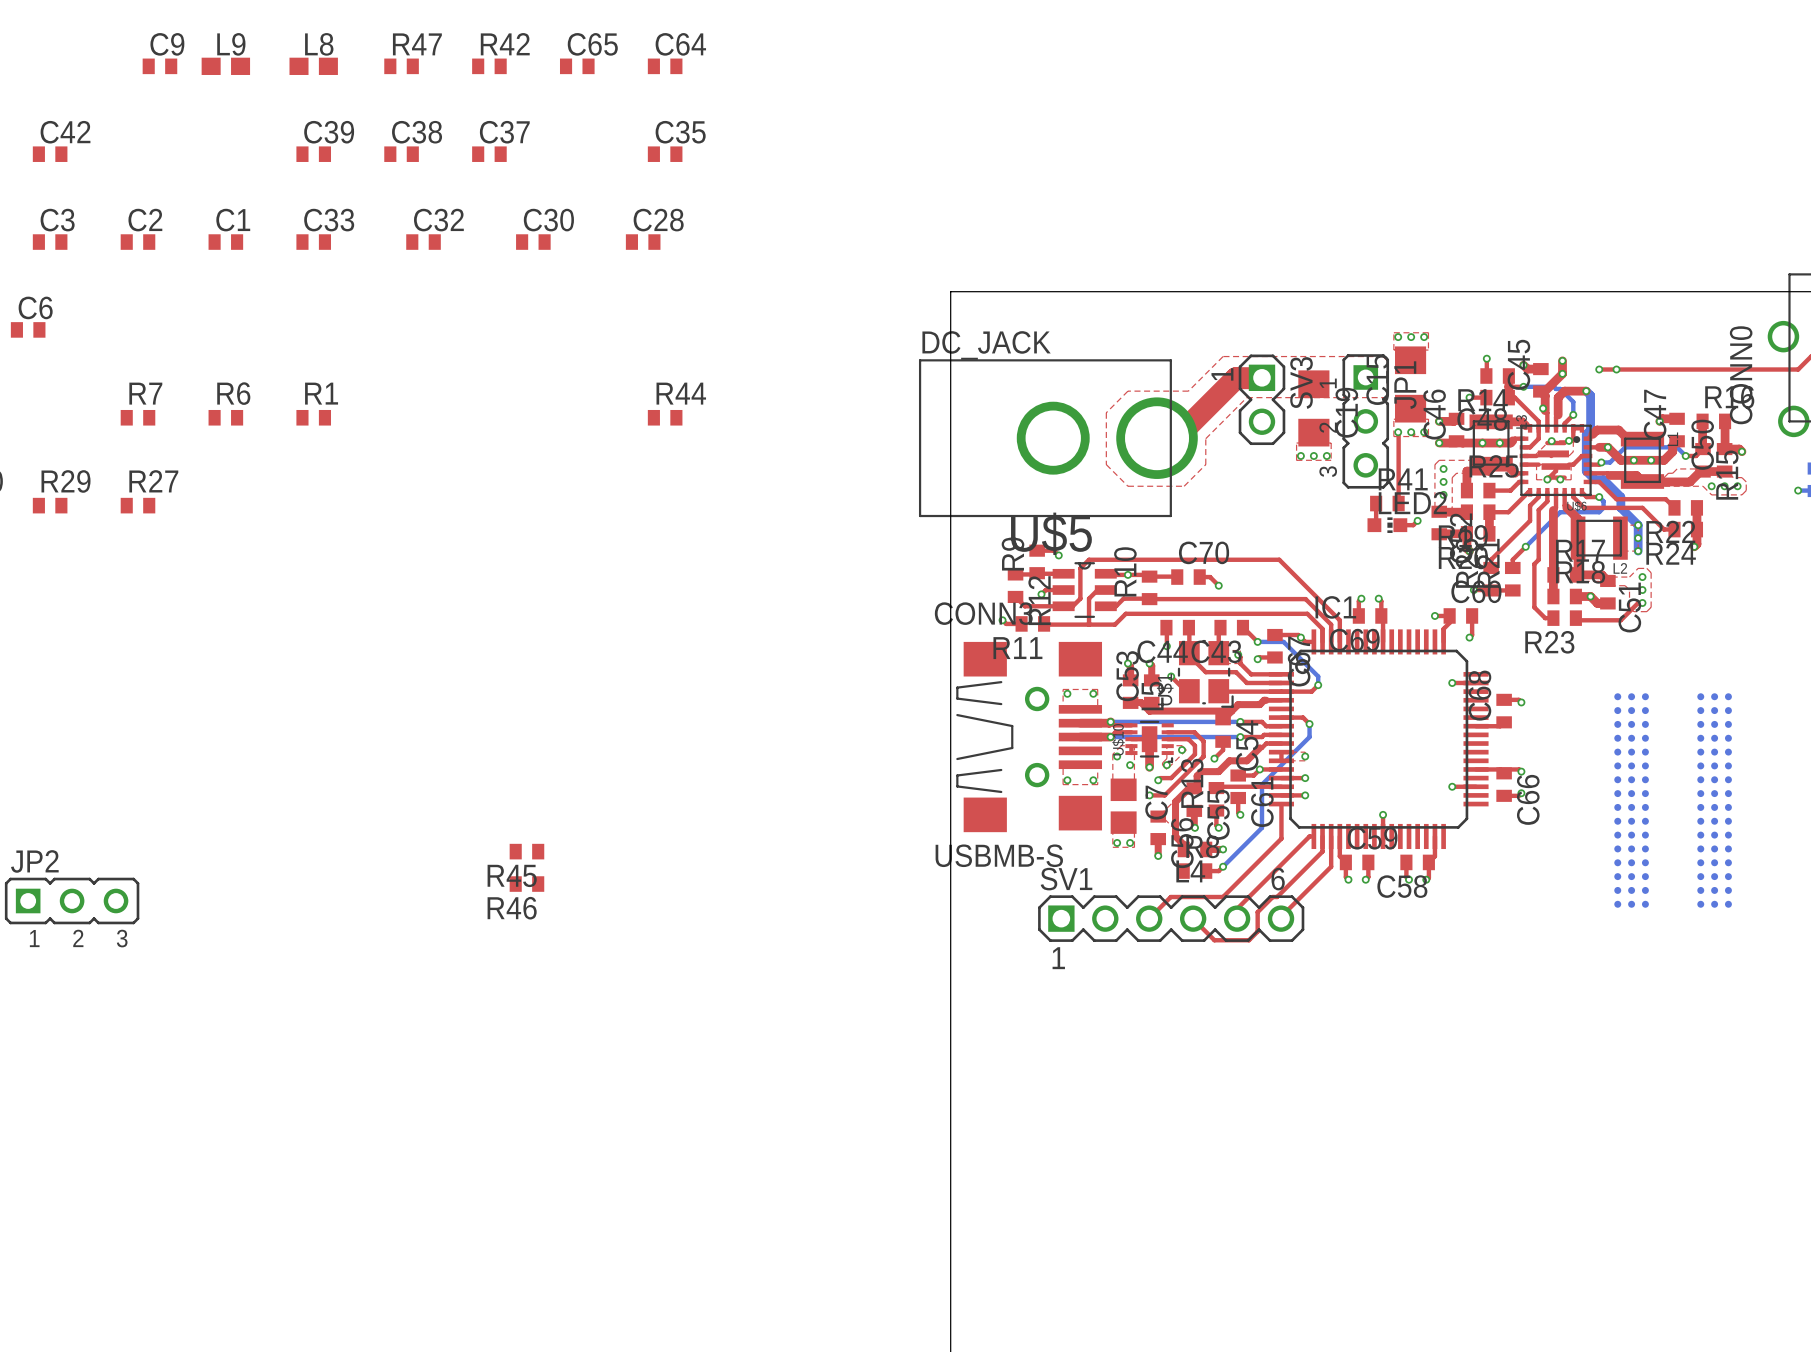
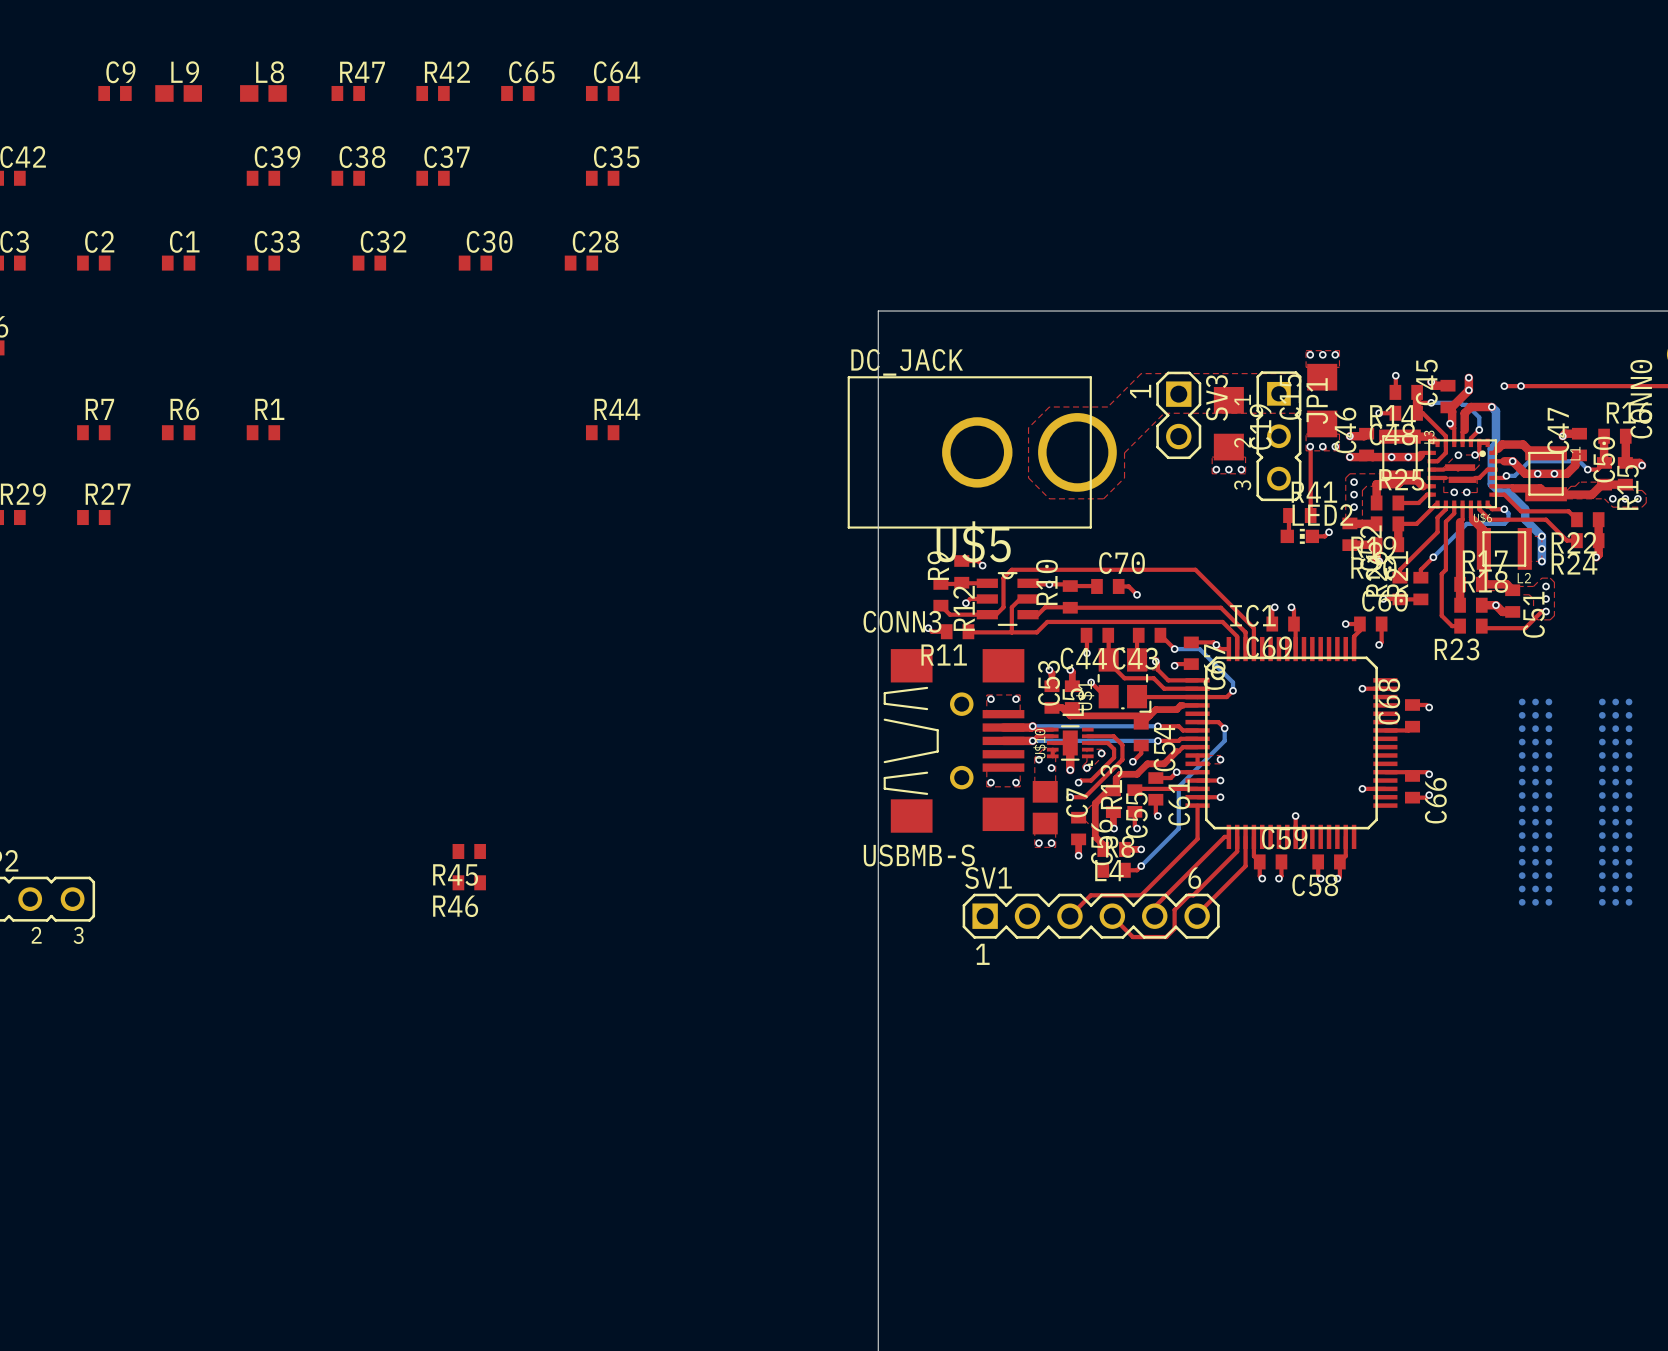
top track: (1261, 377) (1236, 378) (1176, 438) (1157, 438) -> none
top track: (1547, 443) (1564, 443) -> none
top track: (1556, 466) (1556, 470) (1547, 479) -> none
top track: (1547, 477) (1564, 477) -> none

